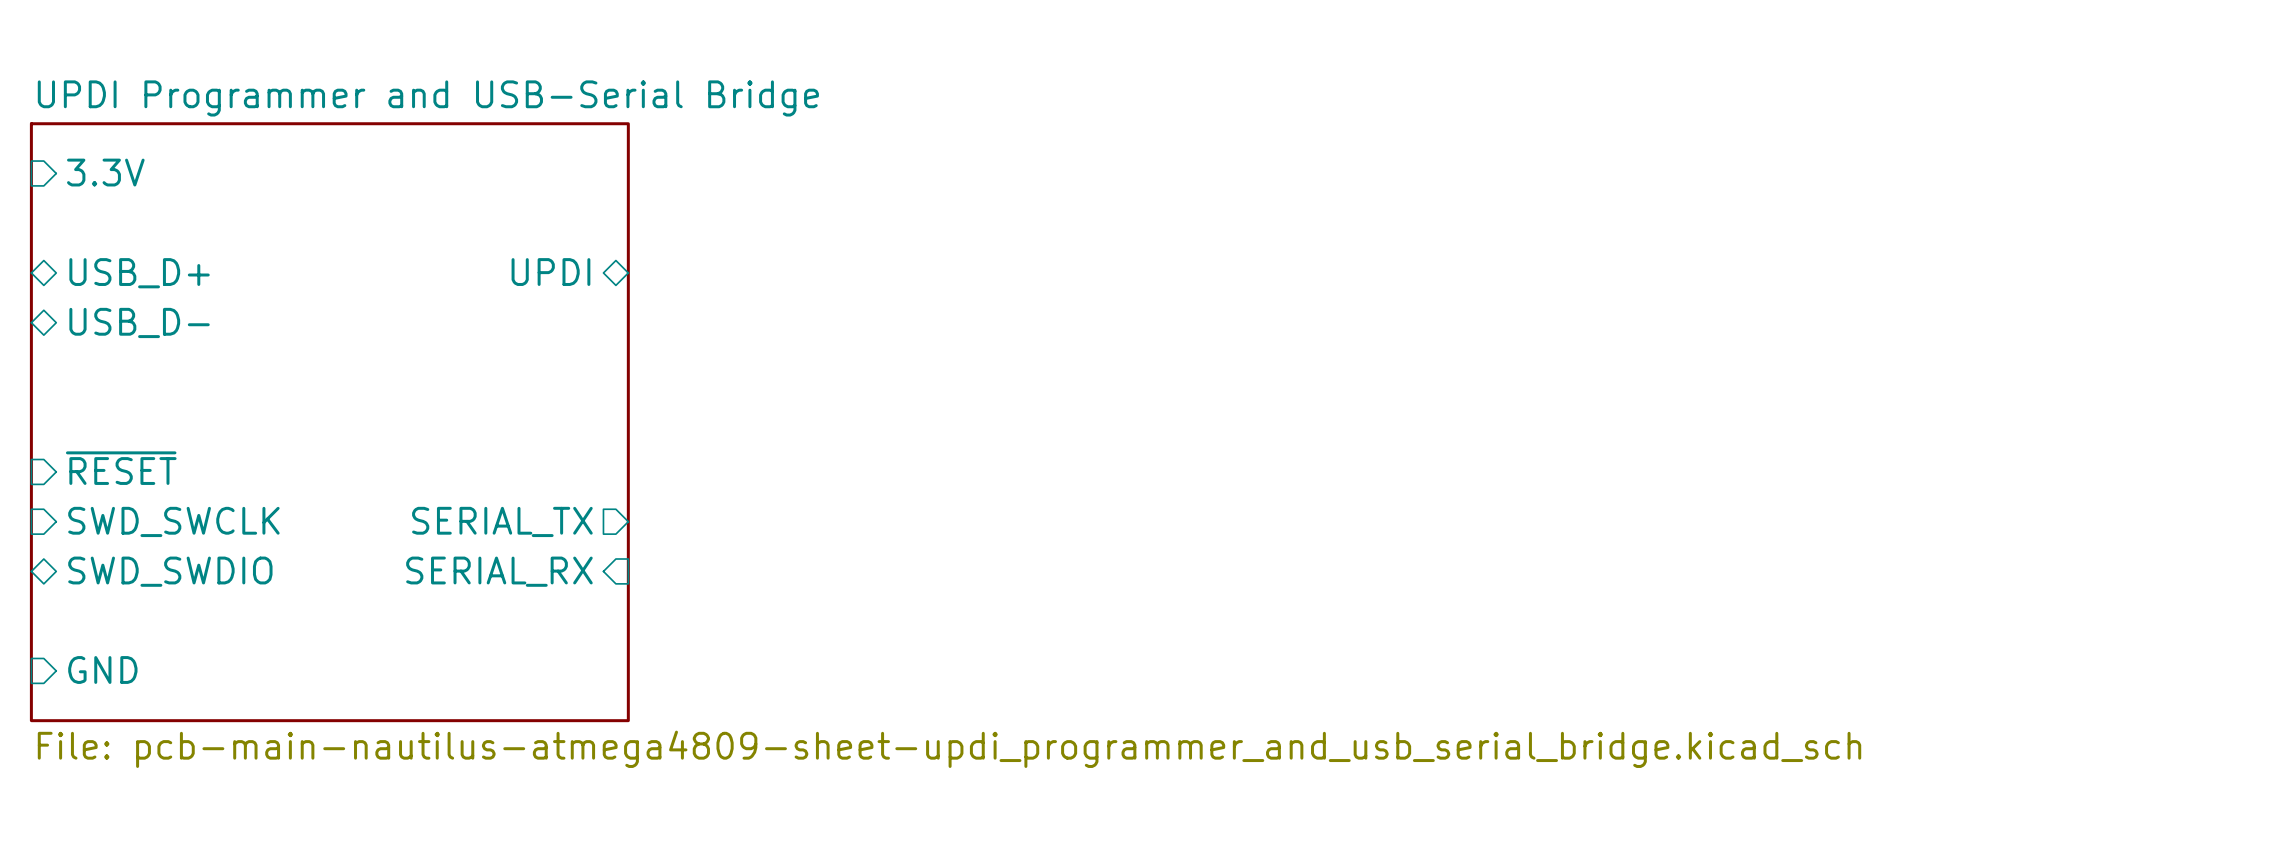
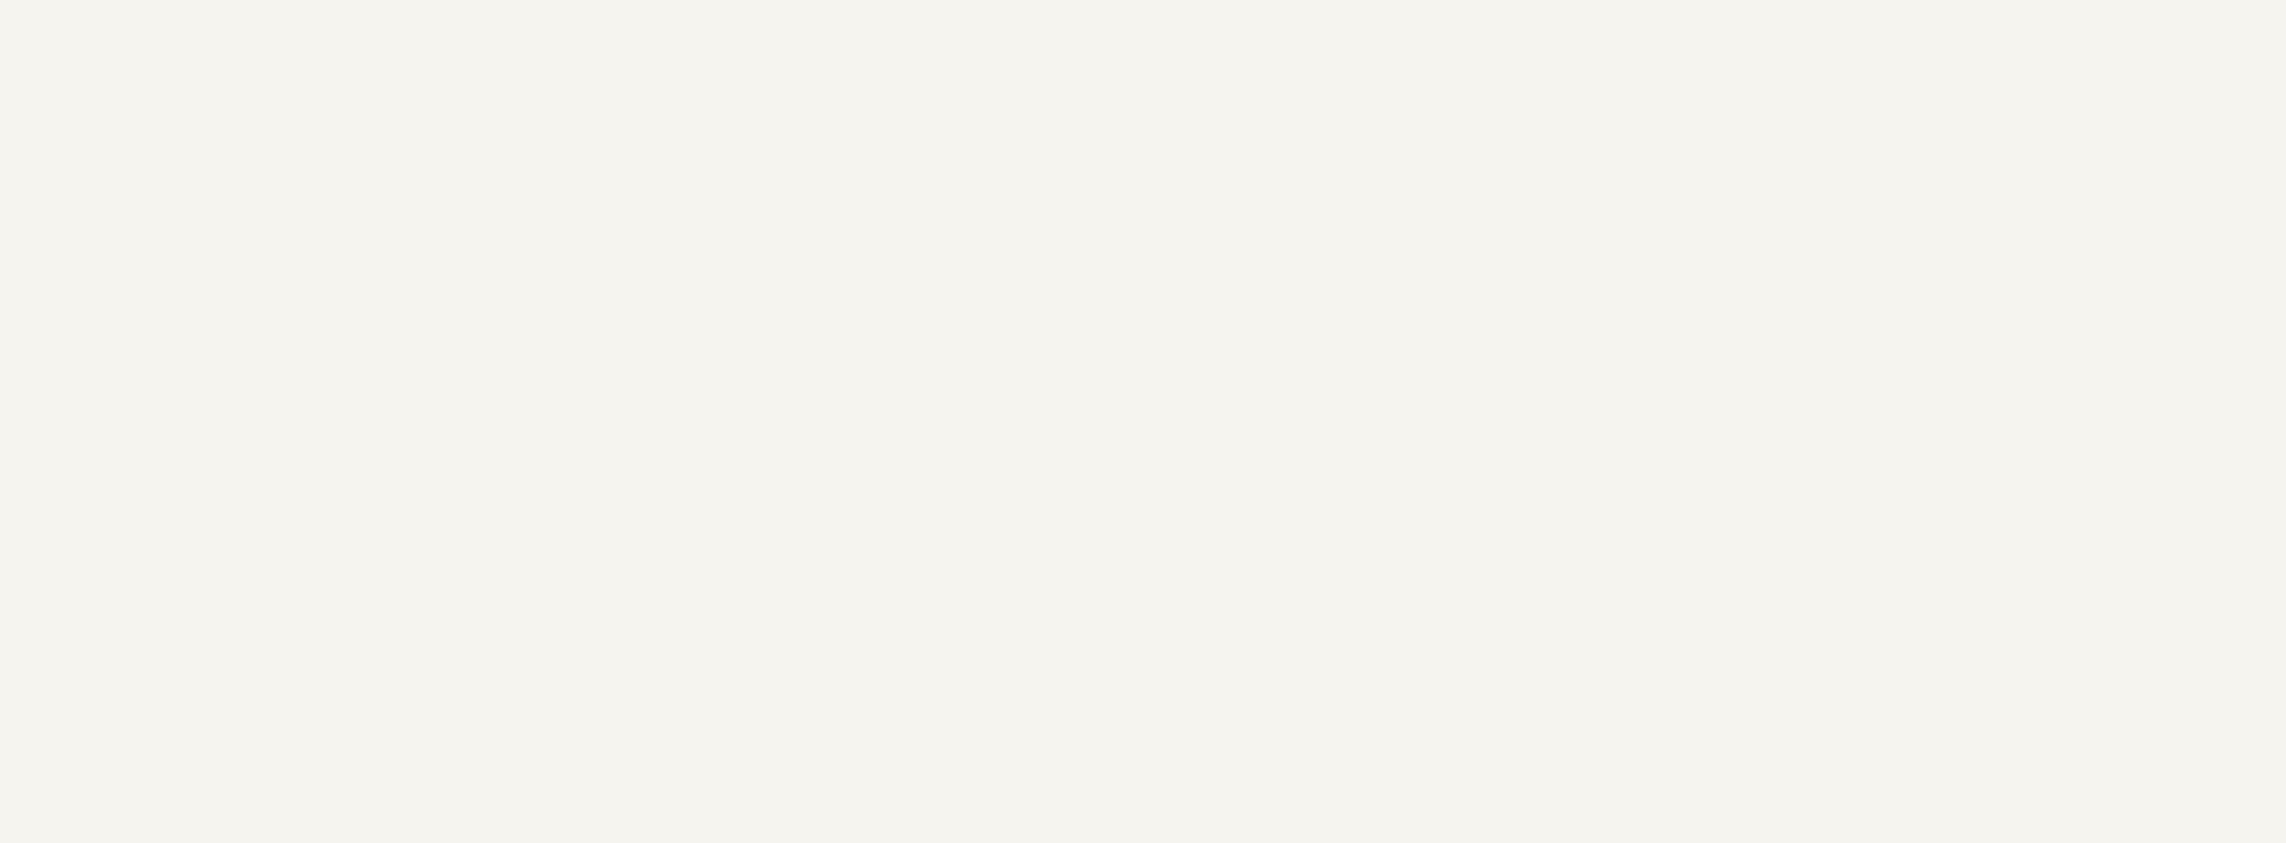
sheet pin: 3.3V (105, 172) -> none
sheet pin: UPDI (550, 272) -> none
sheet pin: USB_D+ (139, 273) -> none
sheet pin: USB_D- (139, 322) -> none
sheet UPDI Programmer and USB-Serial Bridge: File: pcb-main-nautilus-atmega4809-sheet-updi_programmer_and_usb_serial_bridge.kicad_sch (329, 422) -> none
sheet pin: ~{RESET} (121, 468) -> none
sheet pin: SWD_SWCLK (173, 521) -> none
sheet pin: SERIAL_TX (502, 521) -> none
sheet pin: SWD_SWDIO (170, 571) -> none
sheet pin: SERIAL_RX (499, 571) -> none
sheet pin: GND (102, 669) -> none

